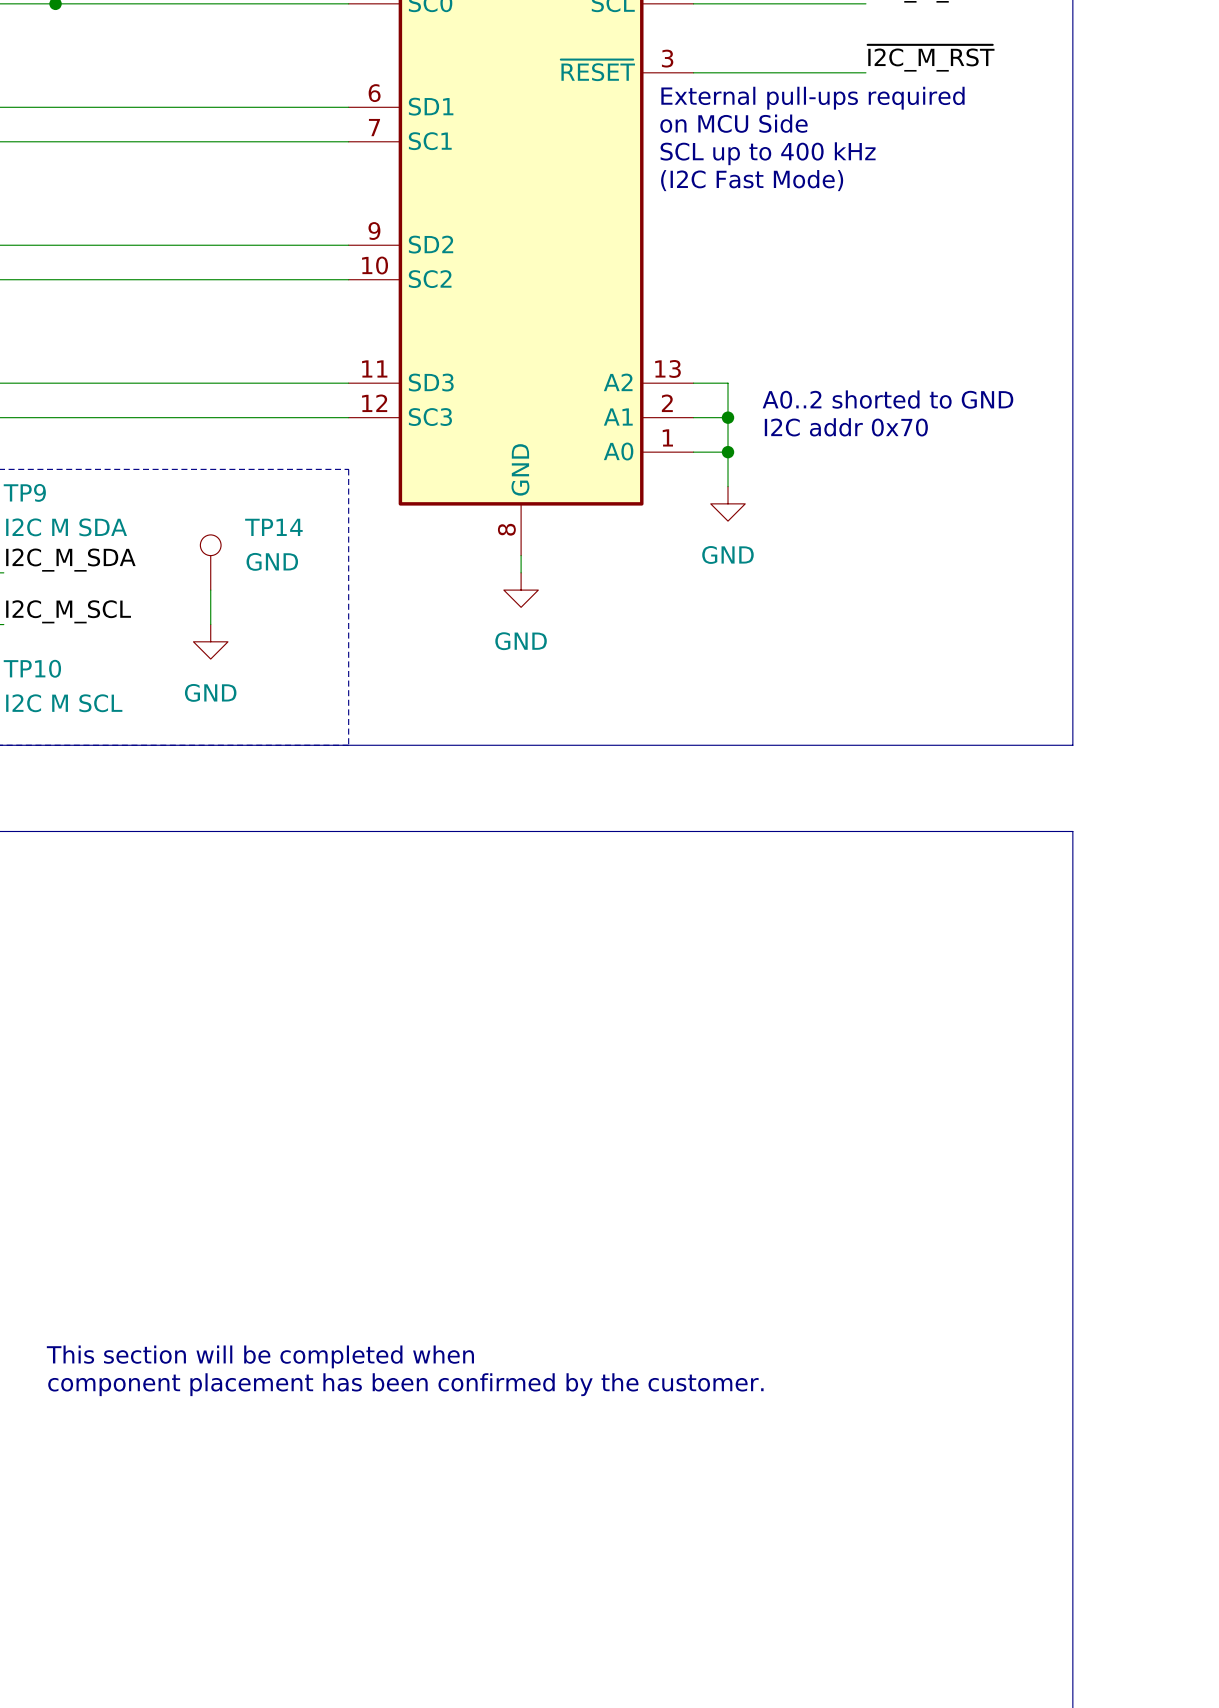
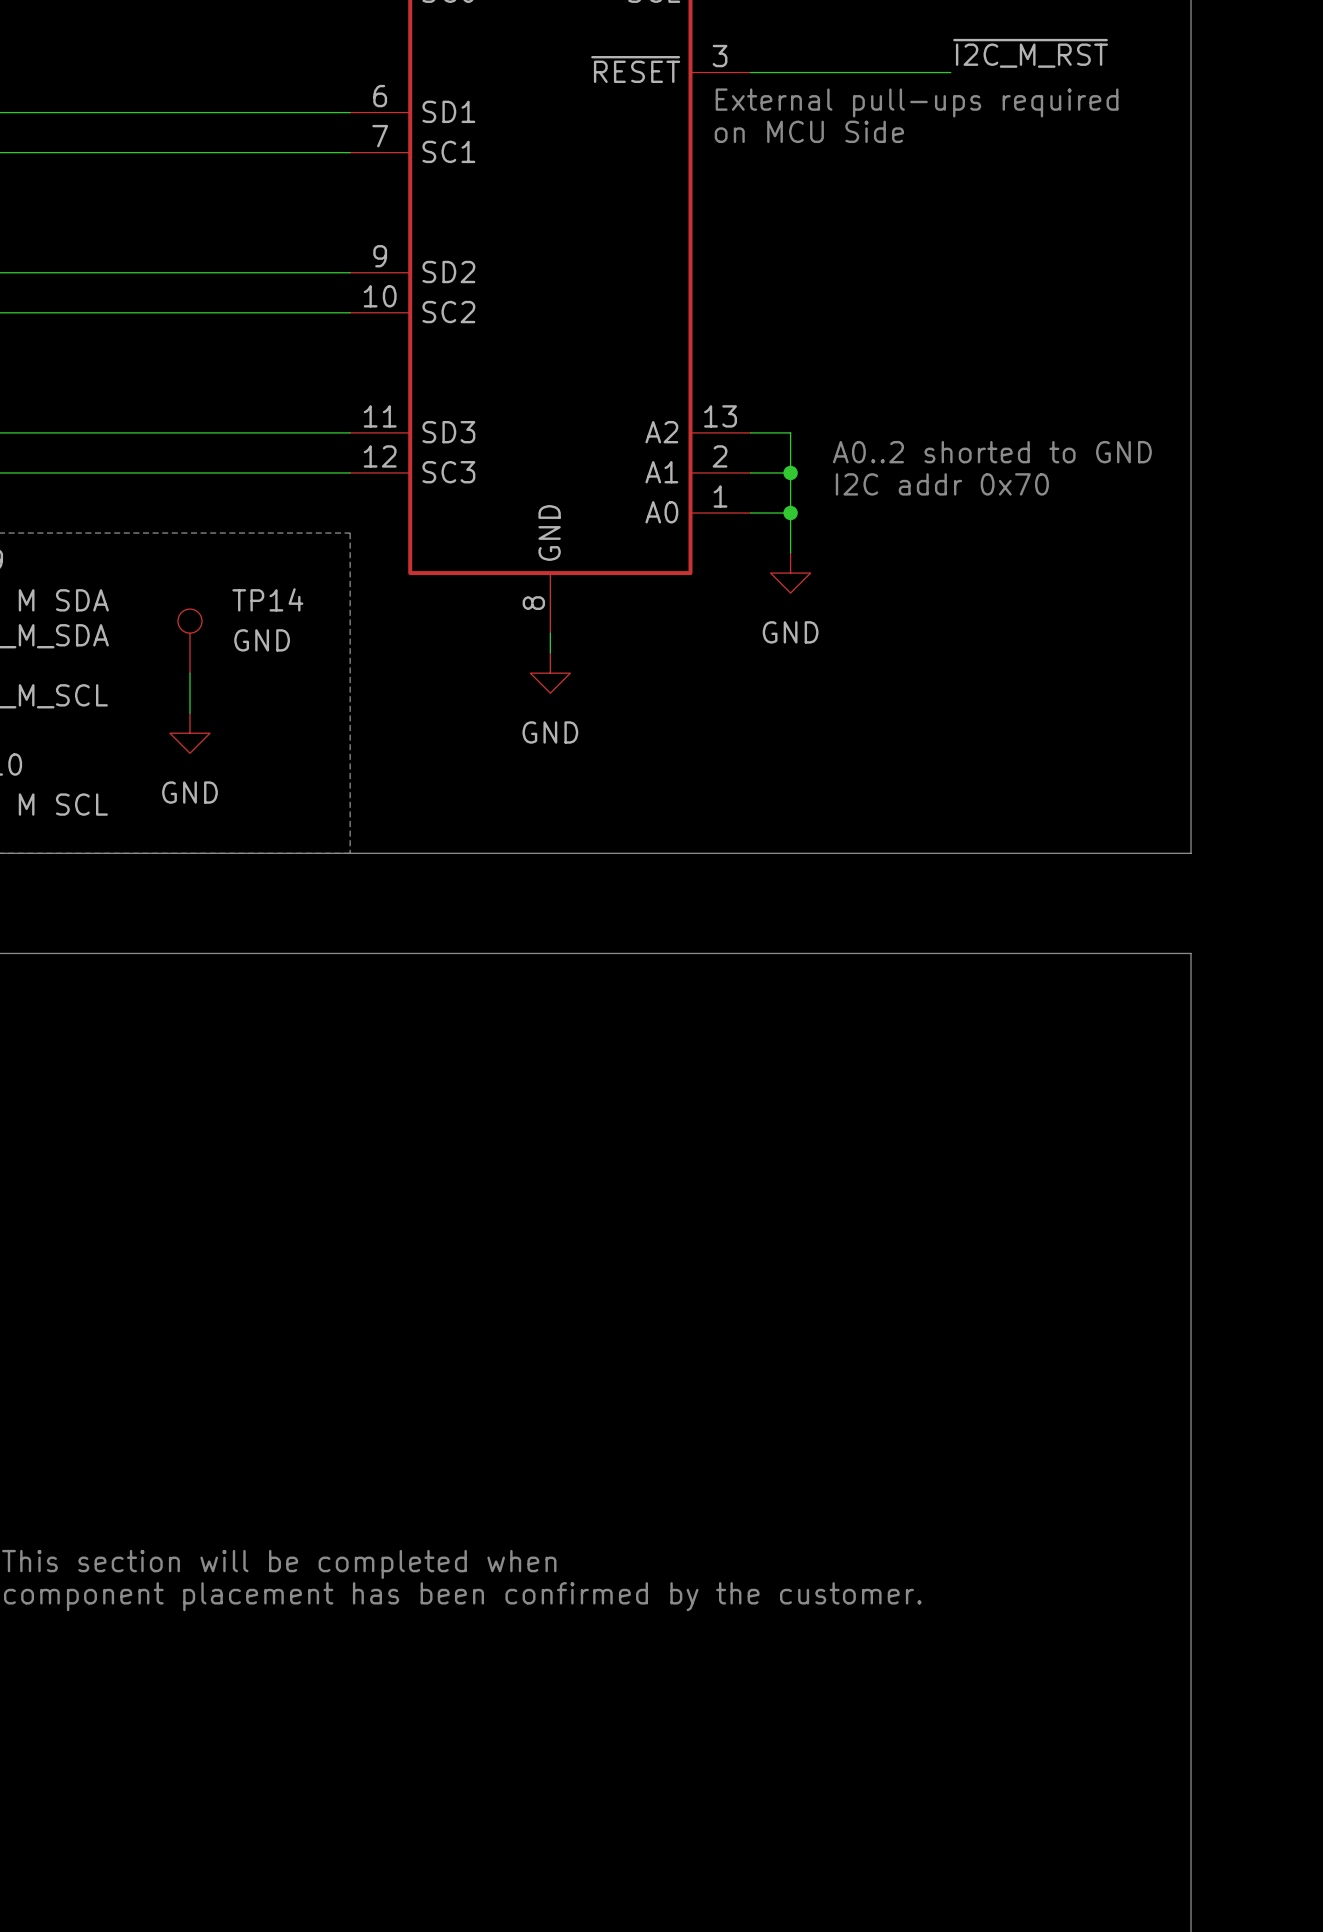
text: SCL up to 400 kHz (768, 153) -> none
text: (I2C Fast Mode) (752, 180) -> none

